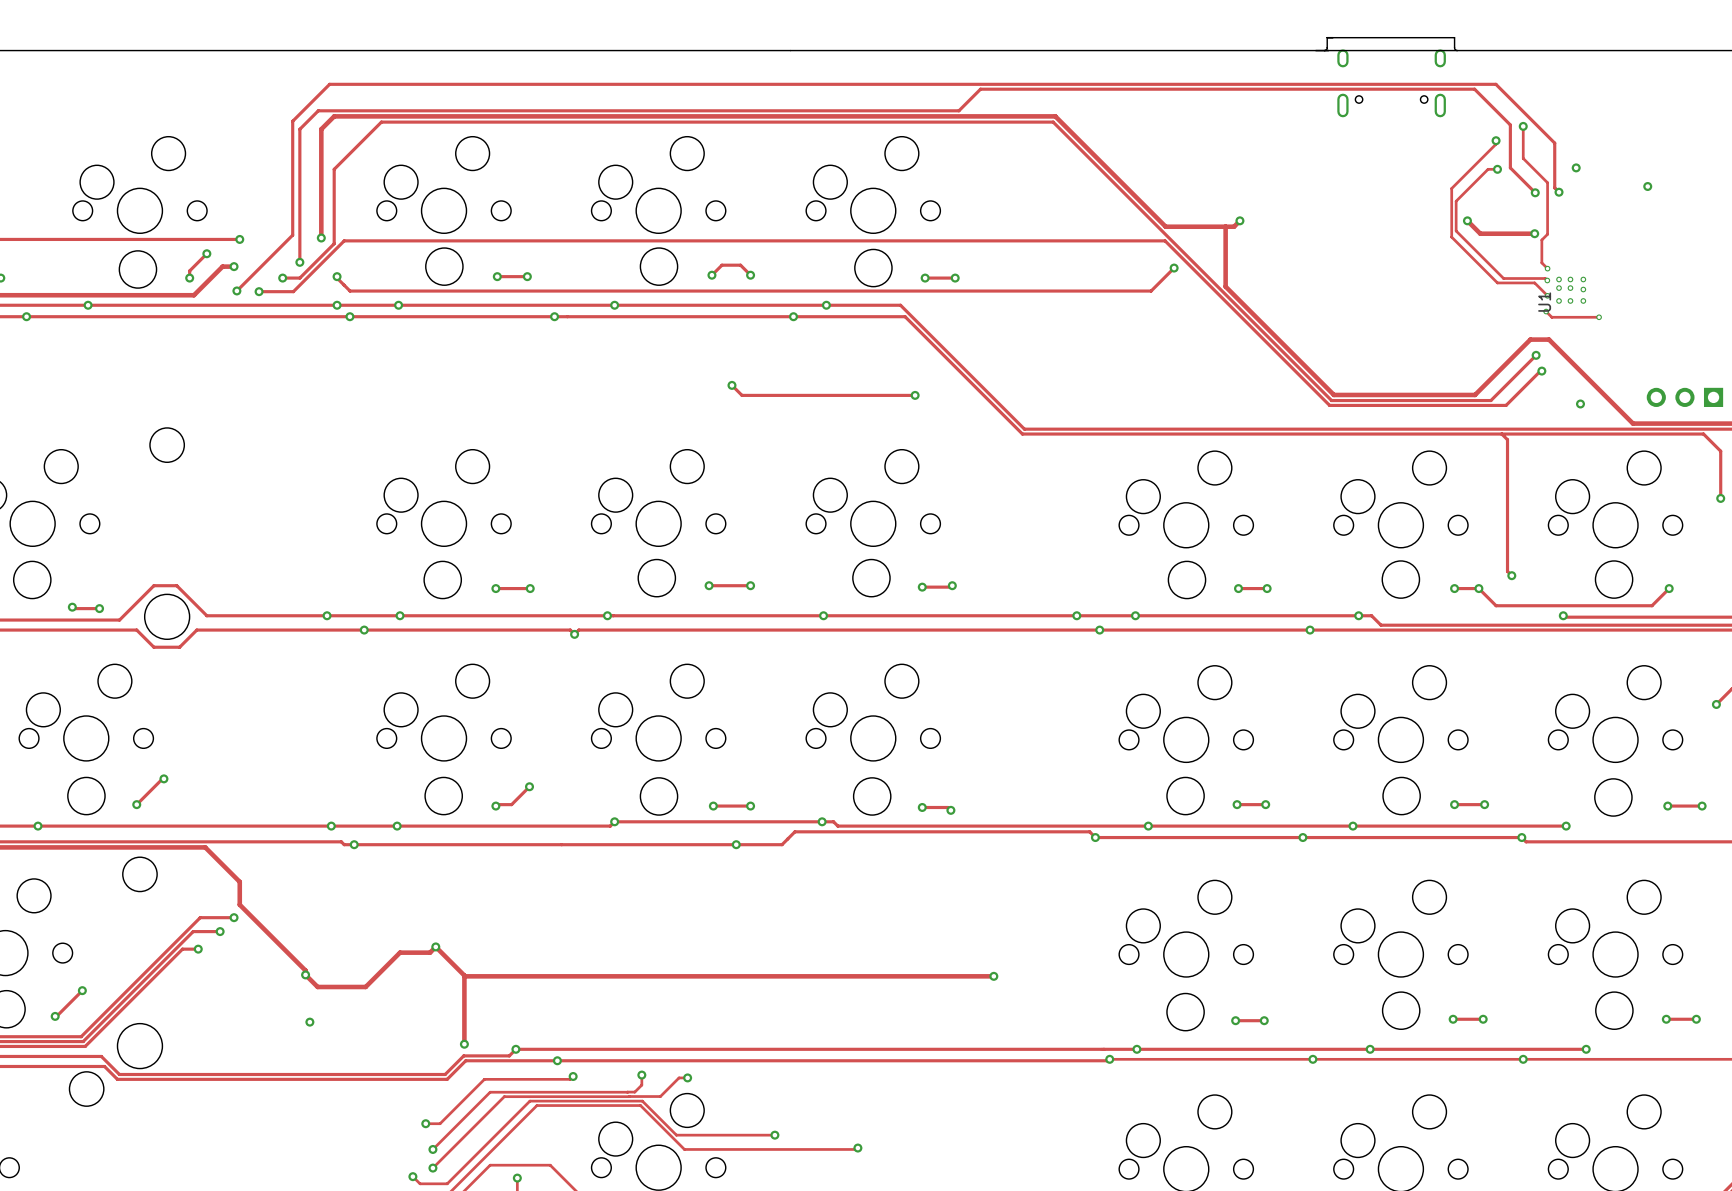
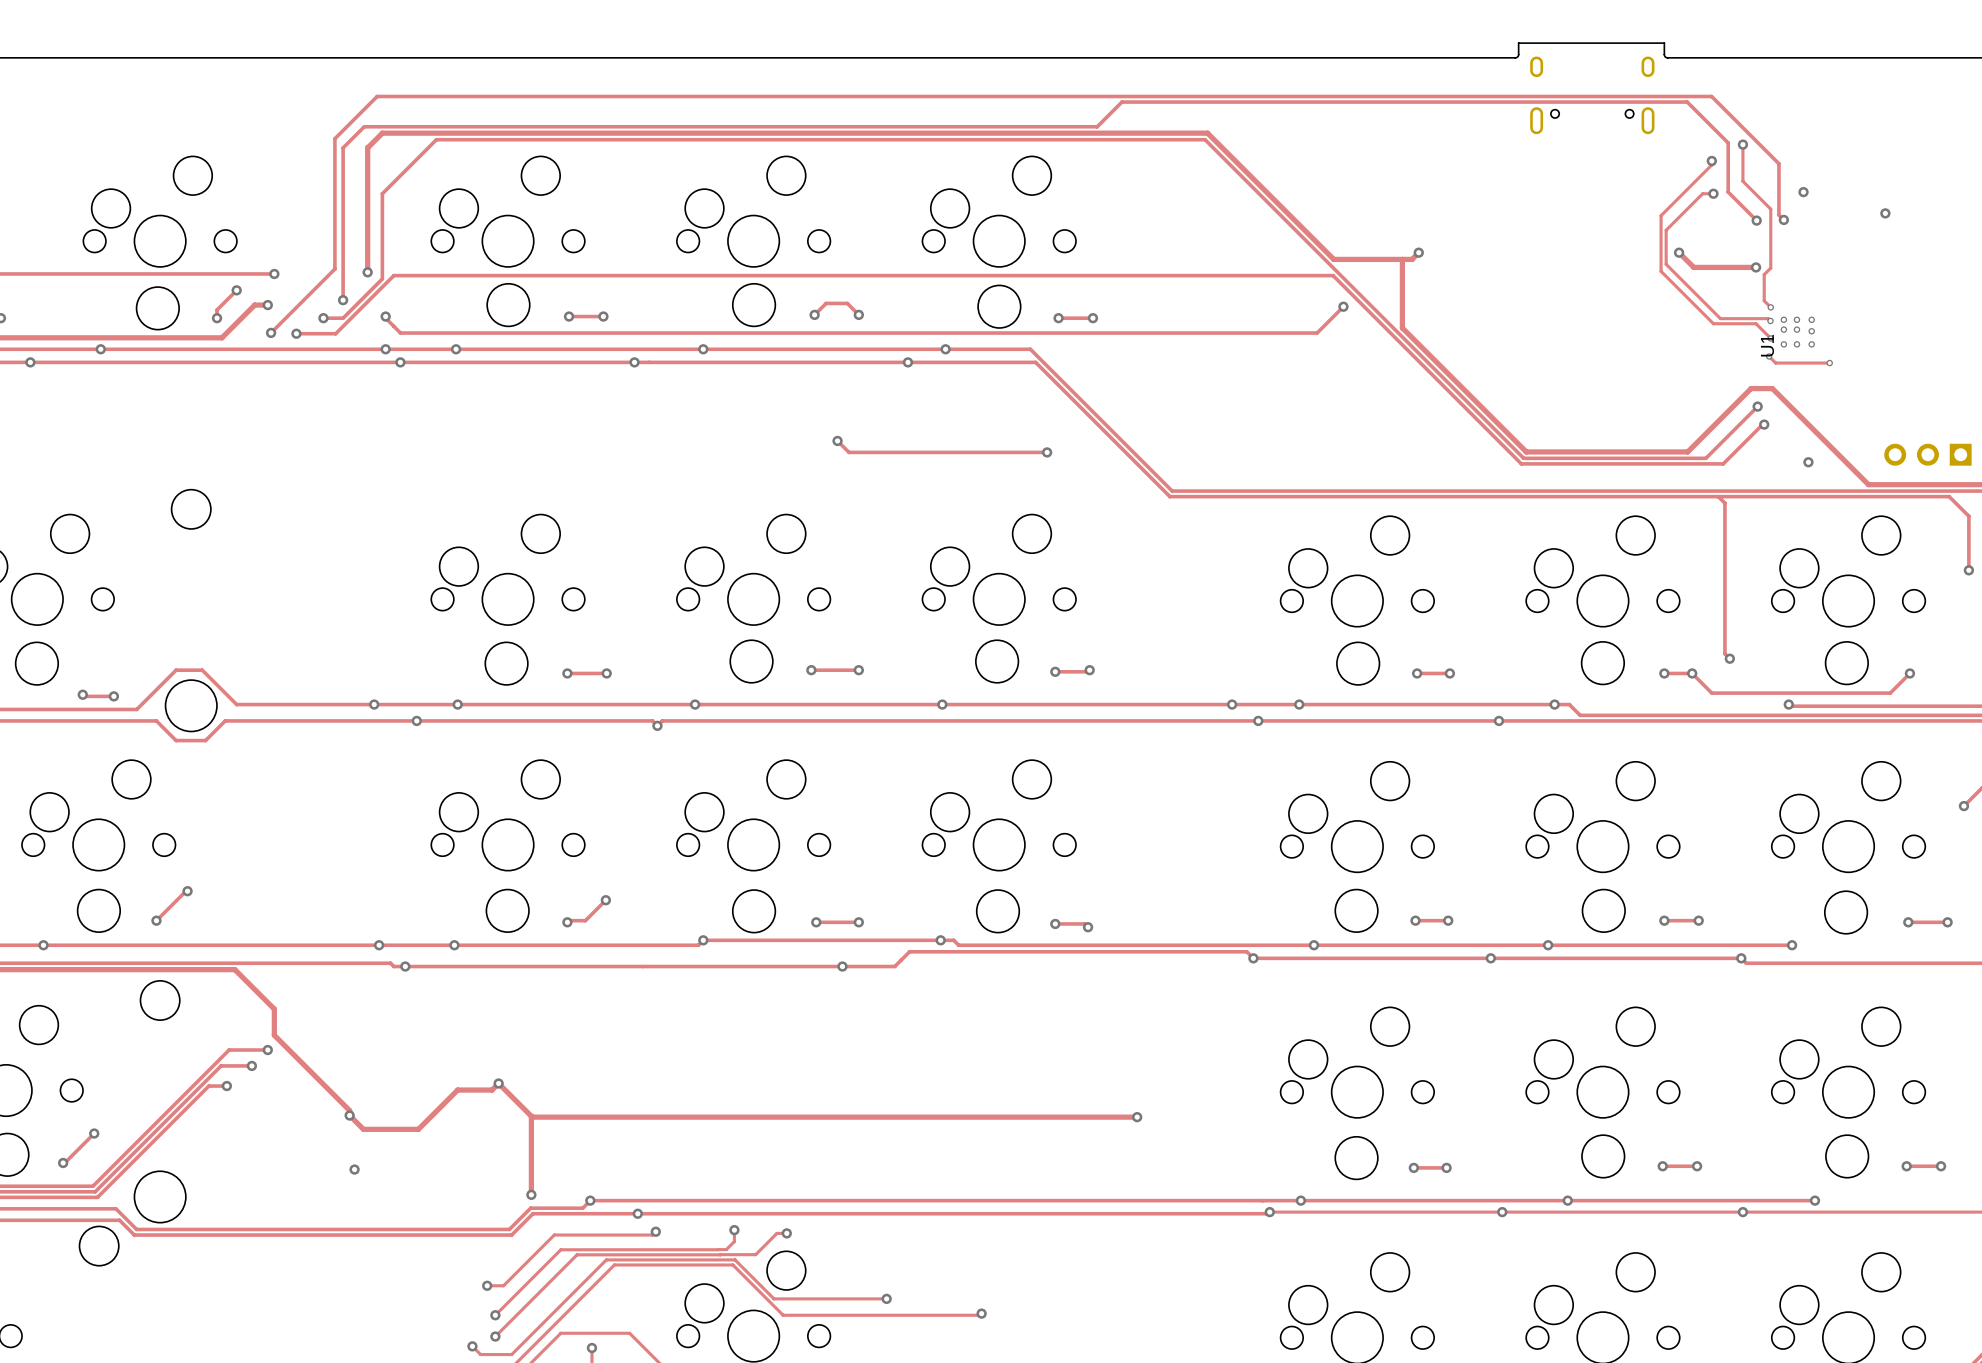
board edge: (1324, 50) (1457, 50) -> none

